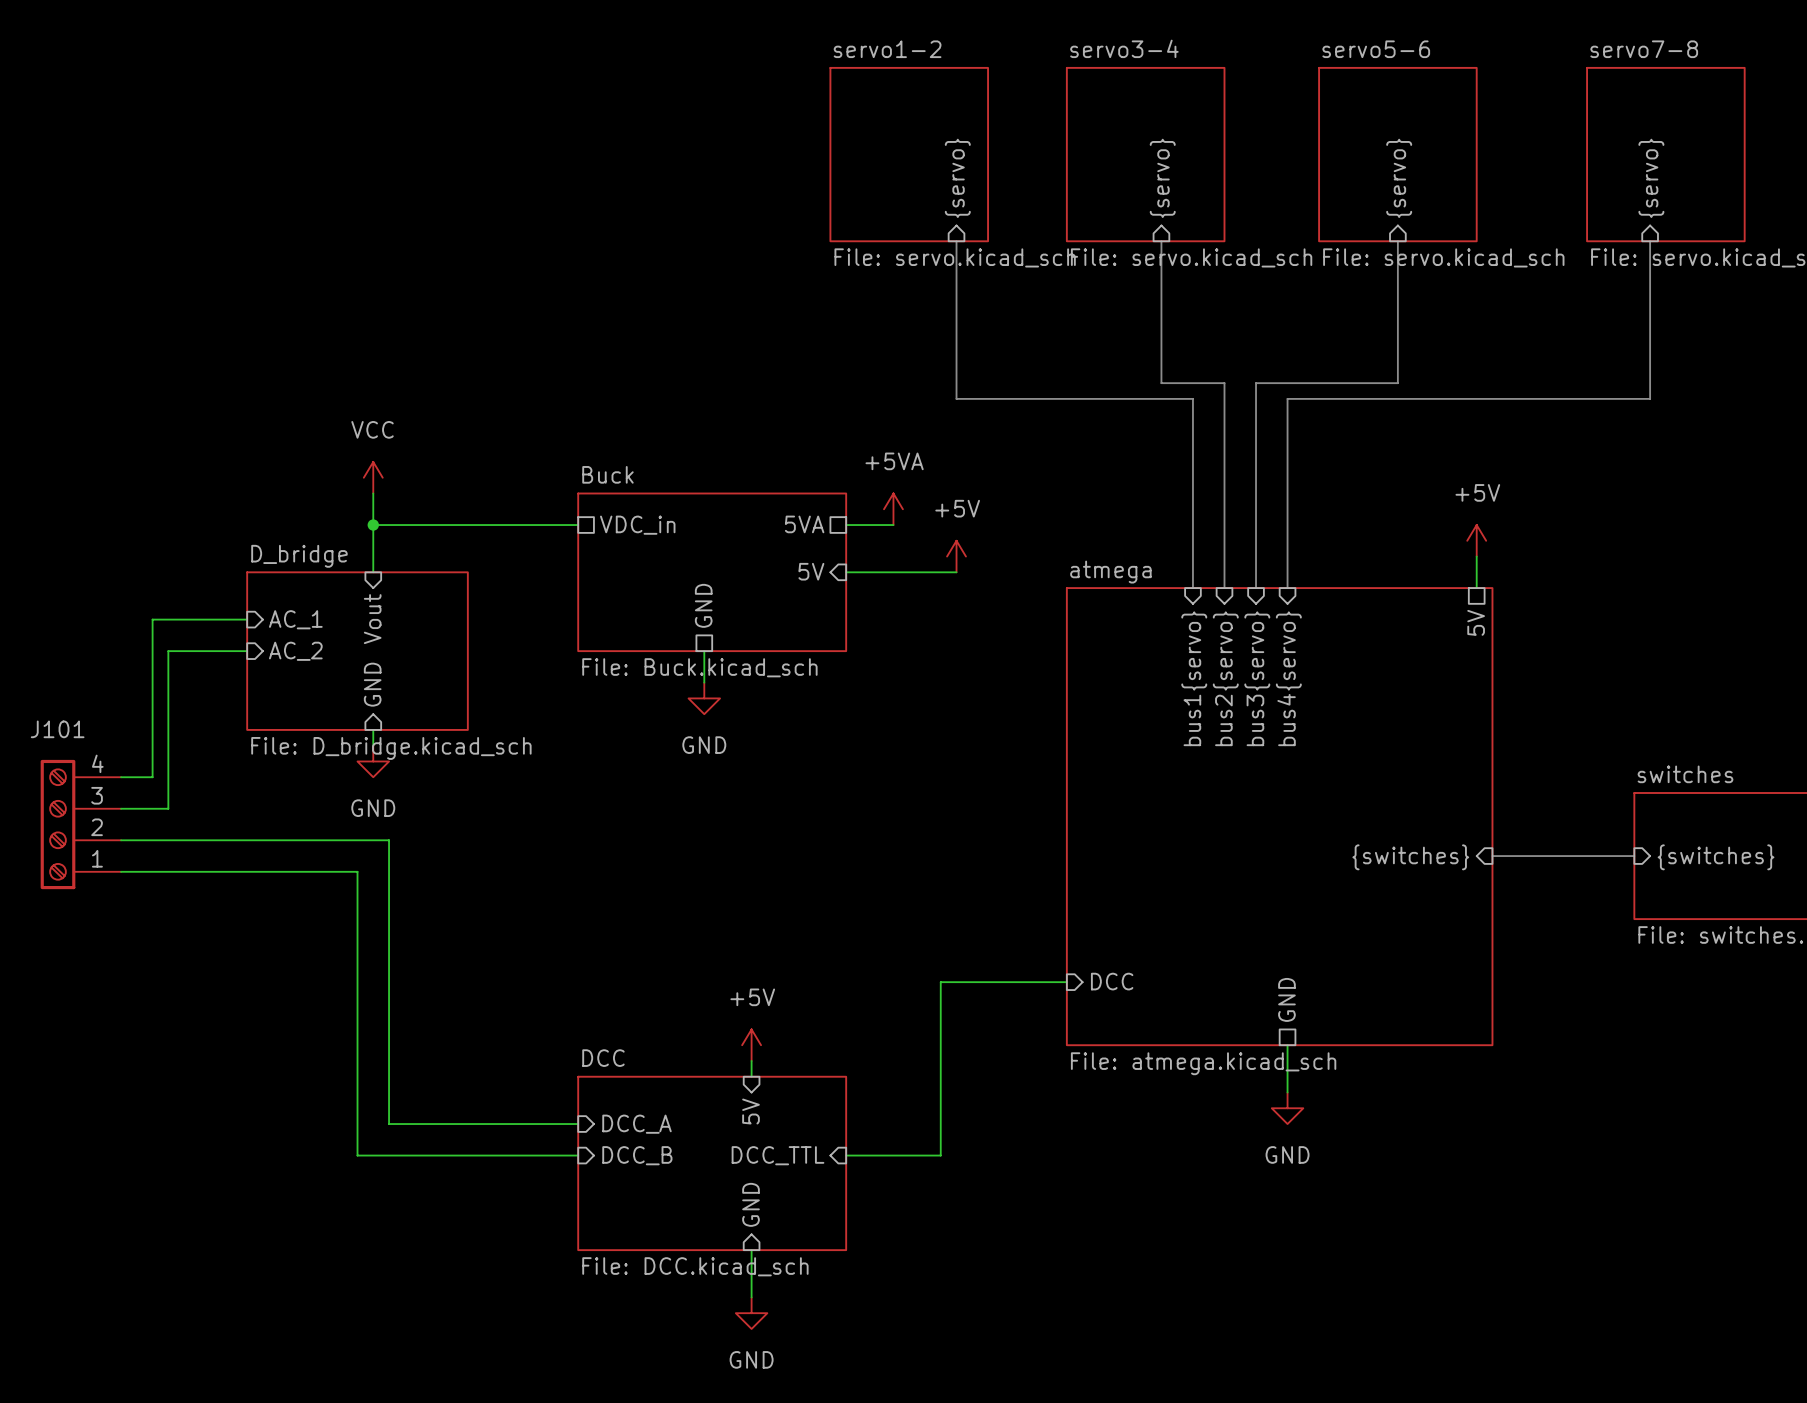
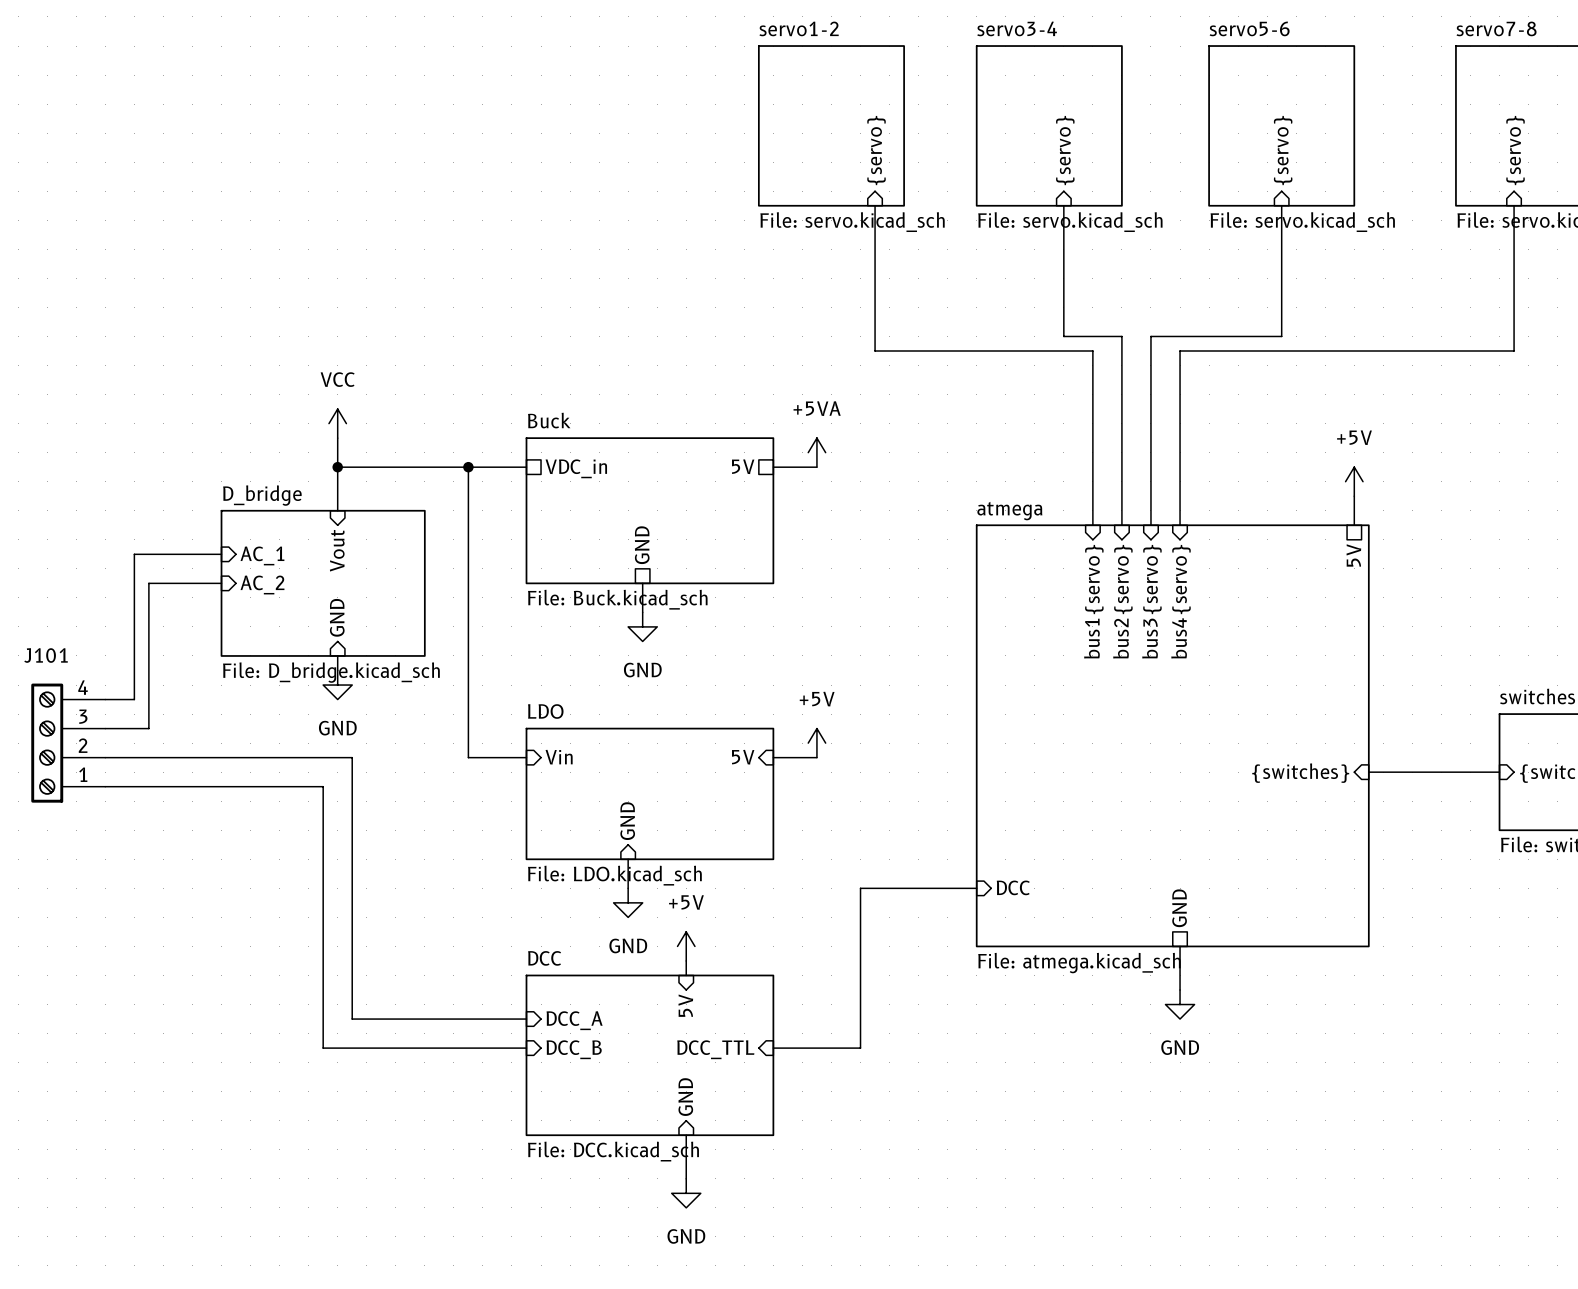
sheet pin: 5VA (804, 524) -> 5V (743, 466)
wire: none -> (468, 467) (468, 757) (526, 757)
junction: none -> (468, 467)
power symbol position: +5V (956, 556) -> +5V (816, 743)
sheet pin position: 5V (811, 571) -> 5V (743, 757)
wire: (846, 572) (956, 572) -> none
sheet pin: none -> Vin (559, 757)
wire: none -> (773, 757) (816, 757)
sheet LDO: none -> File: LDO.kicad_sch (649, 793)
sheet pin: none -> GND (627, 821)
wire: none -> (628, 859) (628, 888)
power symbol: none -> GND (628, 902)

